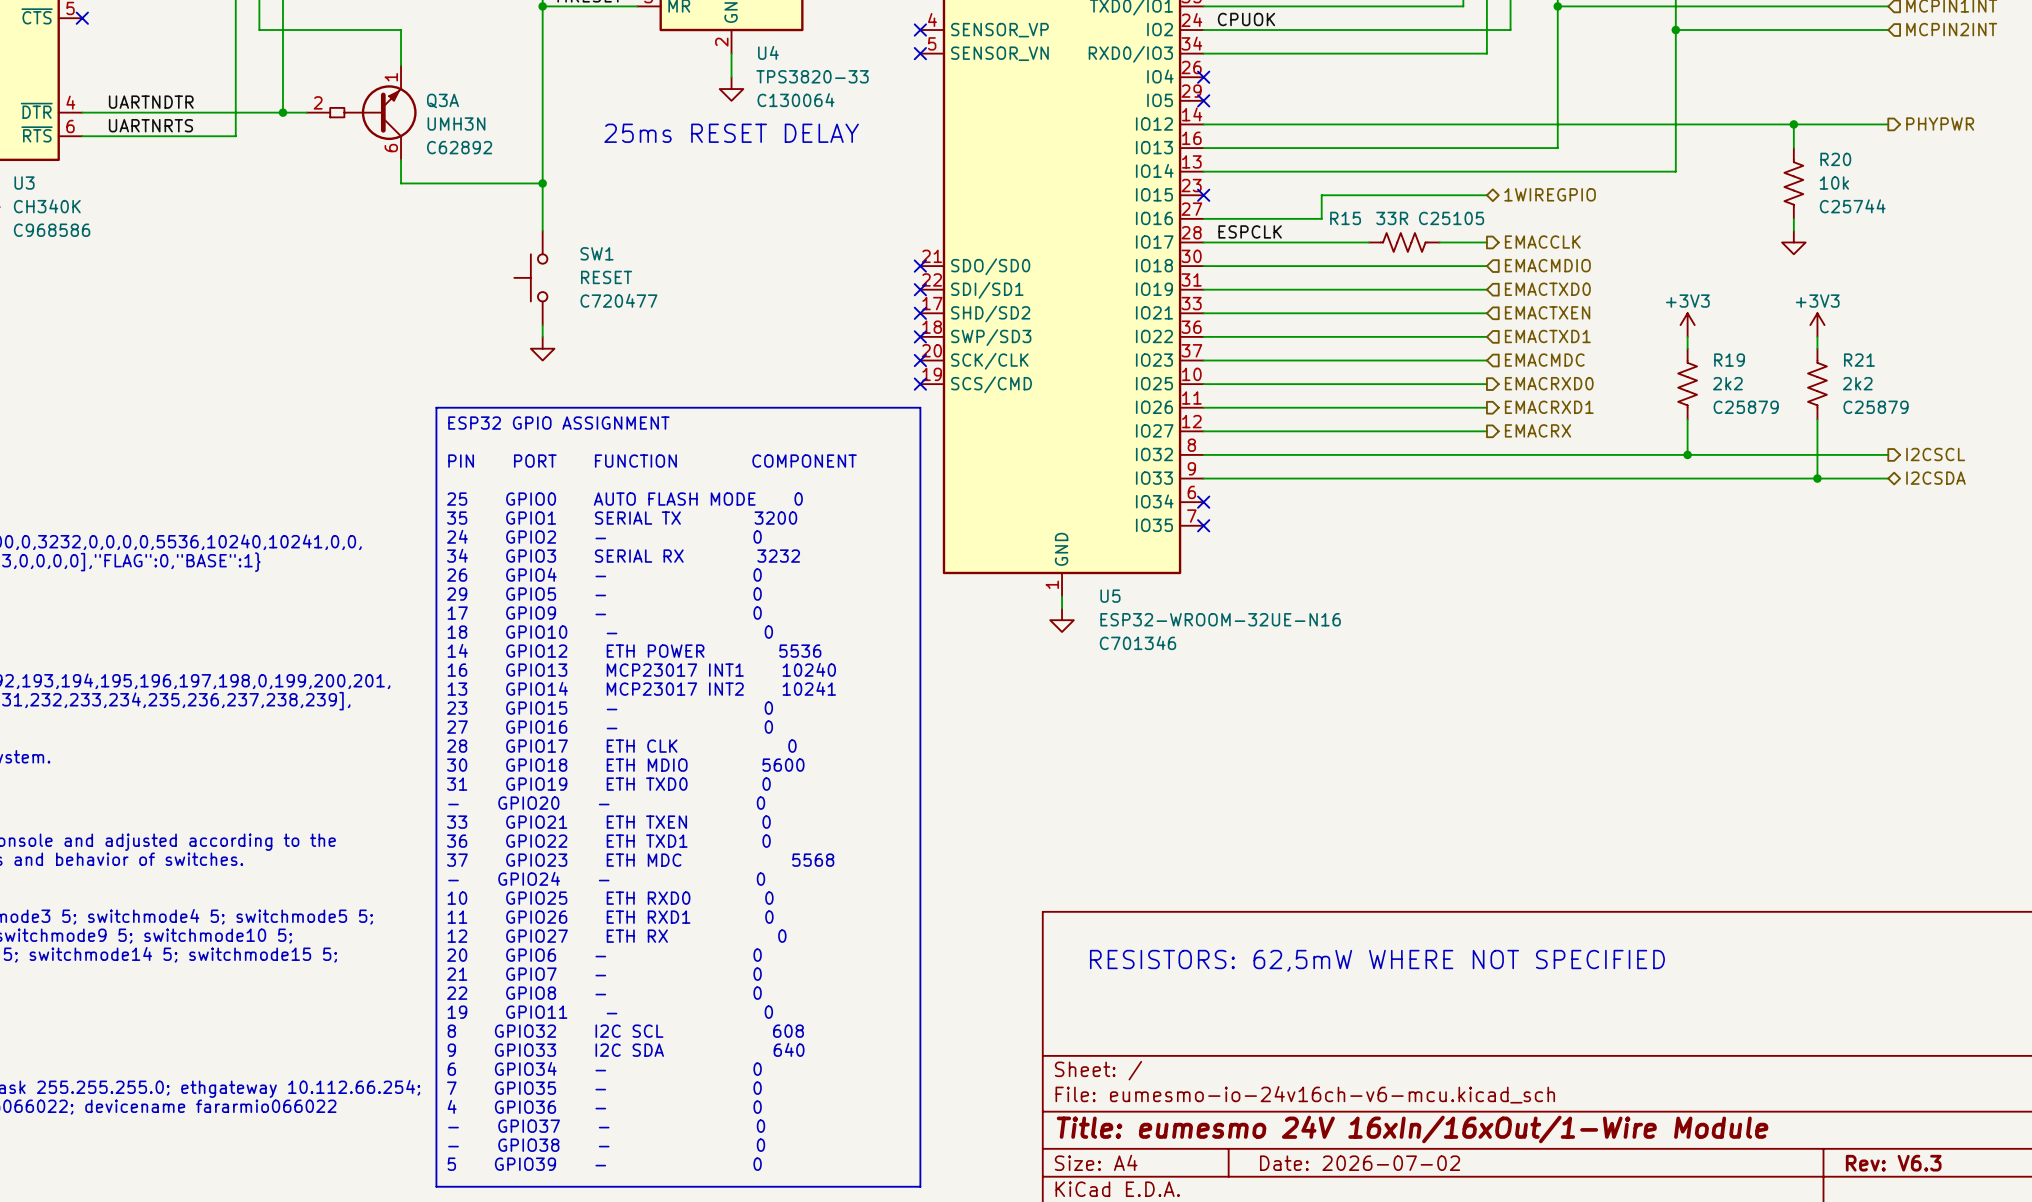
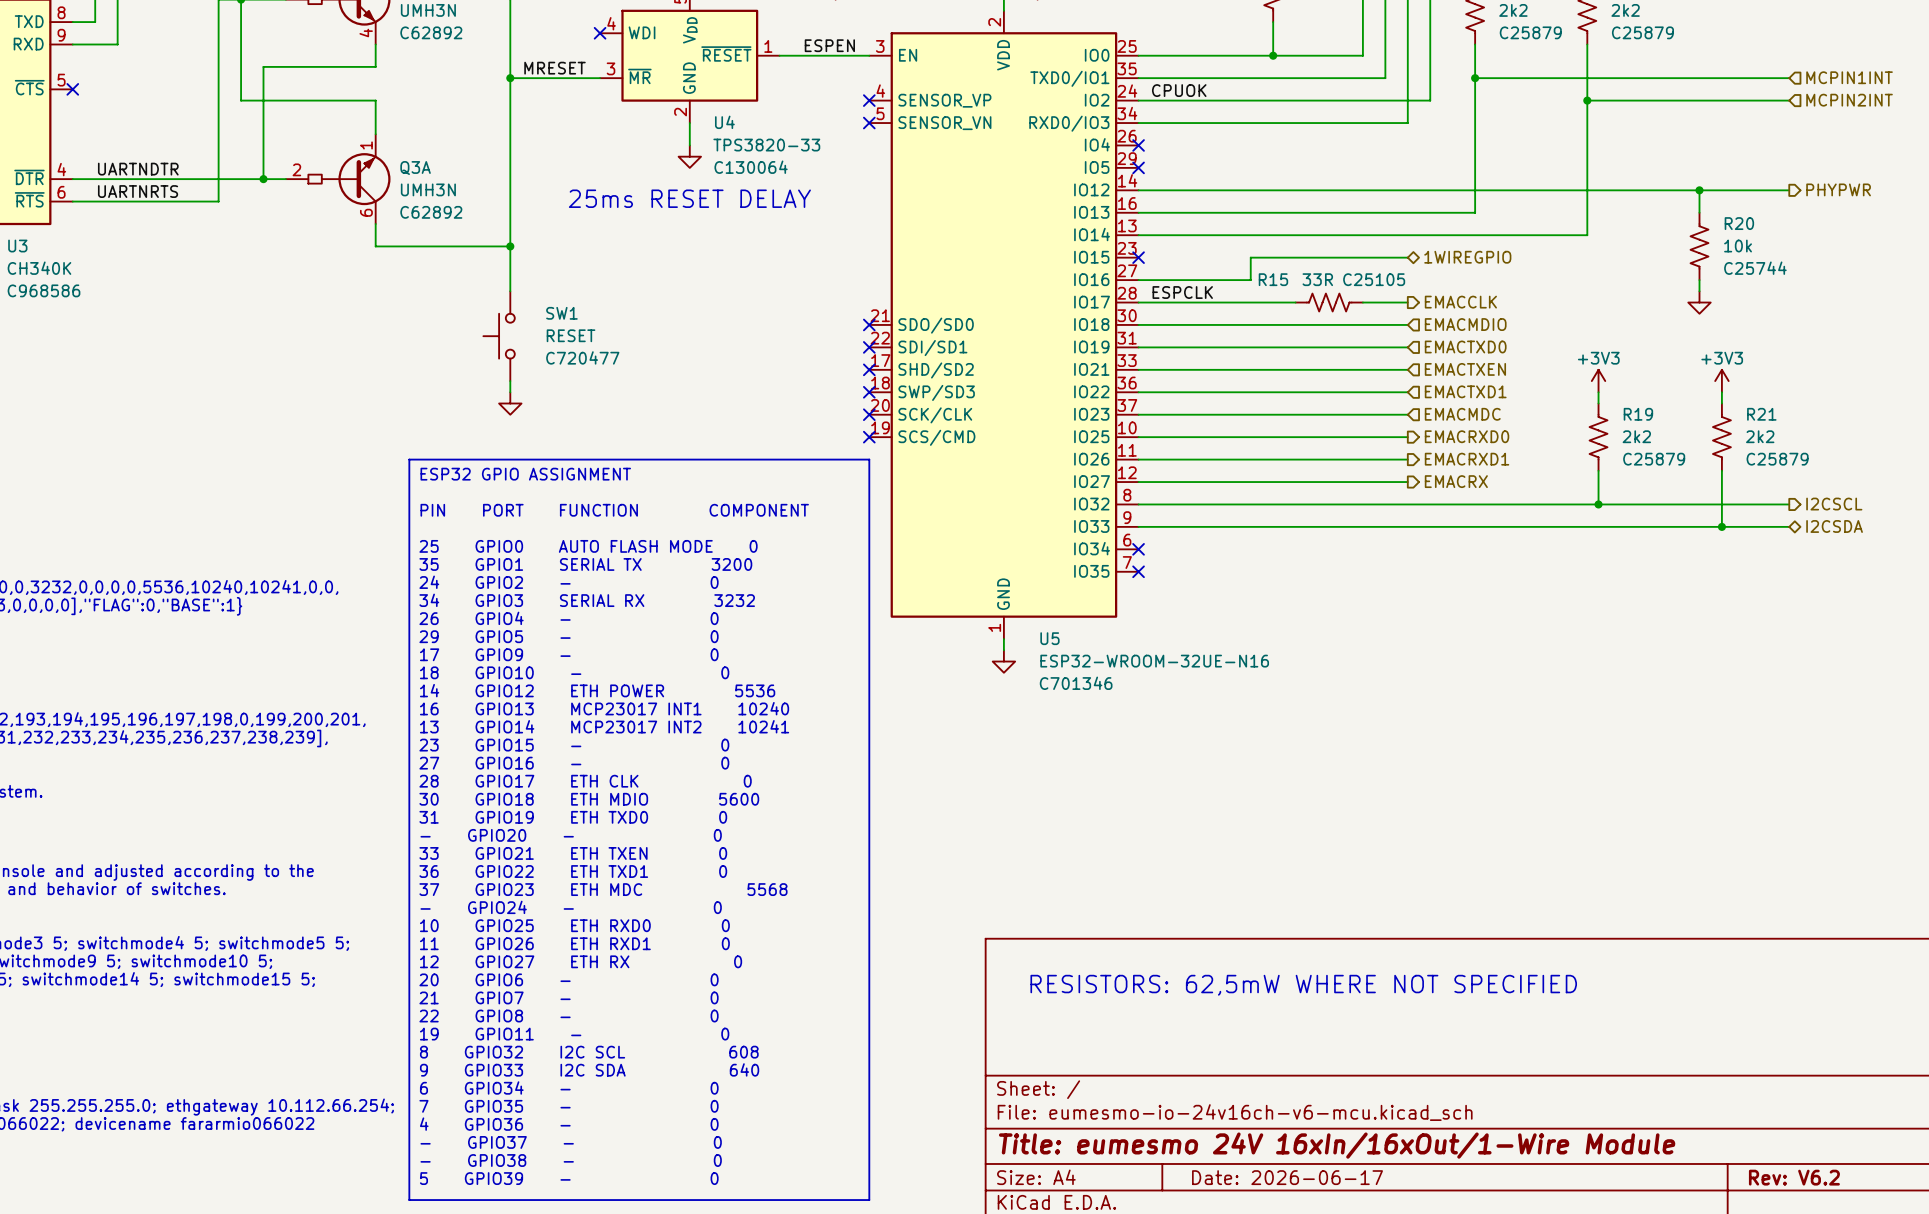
title block: Date: 2026-07-02 (1360, 1163) -> Date: 2026-06-17 (1287, 1177)
title block: Rev: V6.3 (1893, 1163) -> Rev: V6.2 (1794, 1177)

